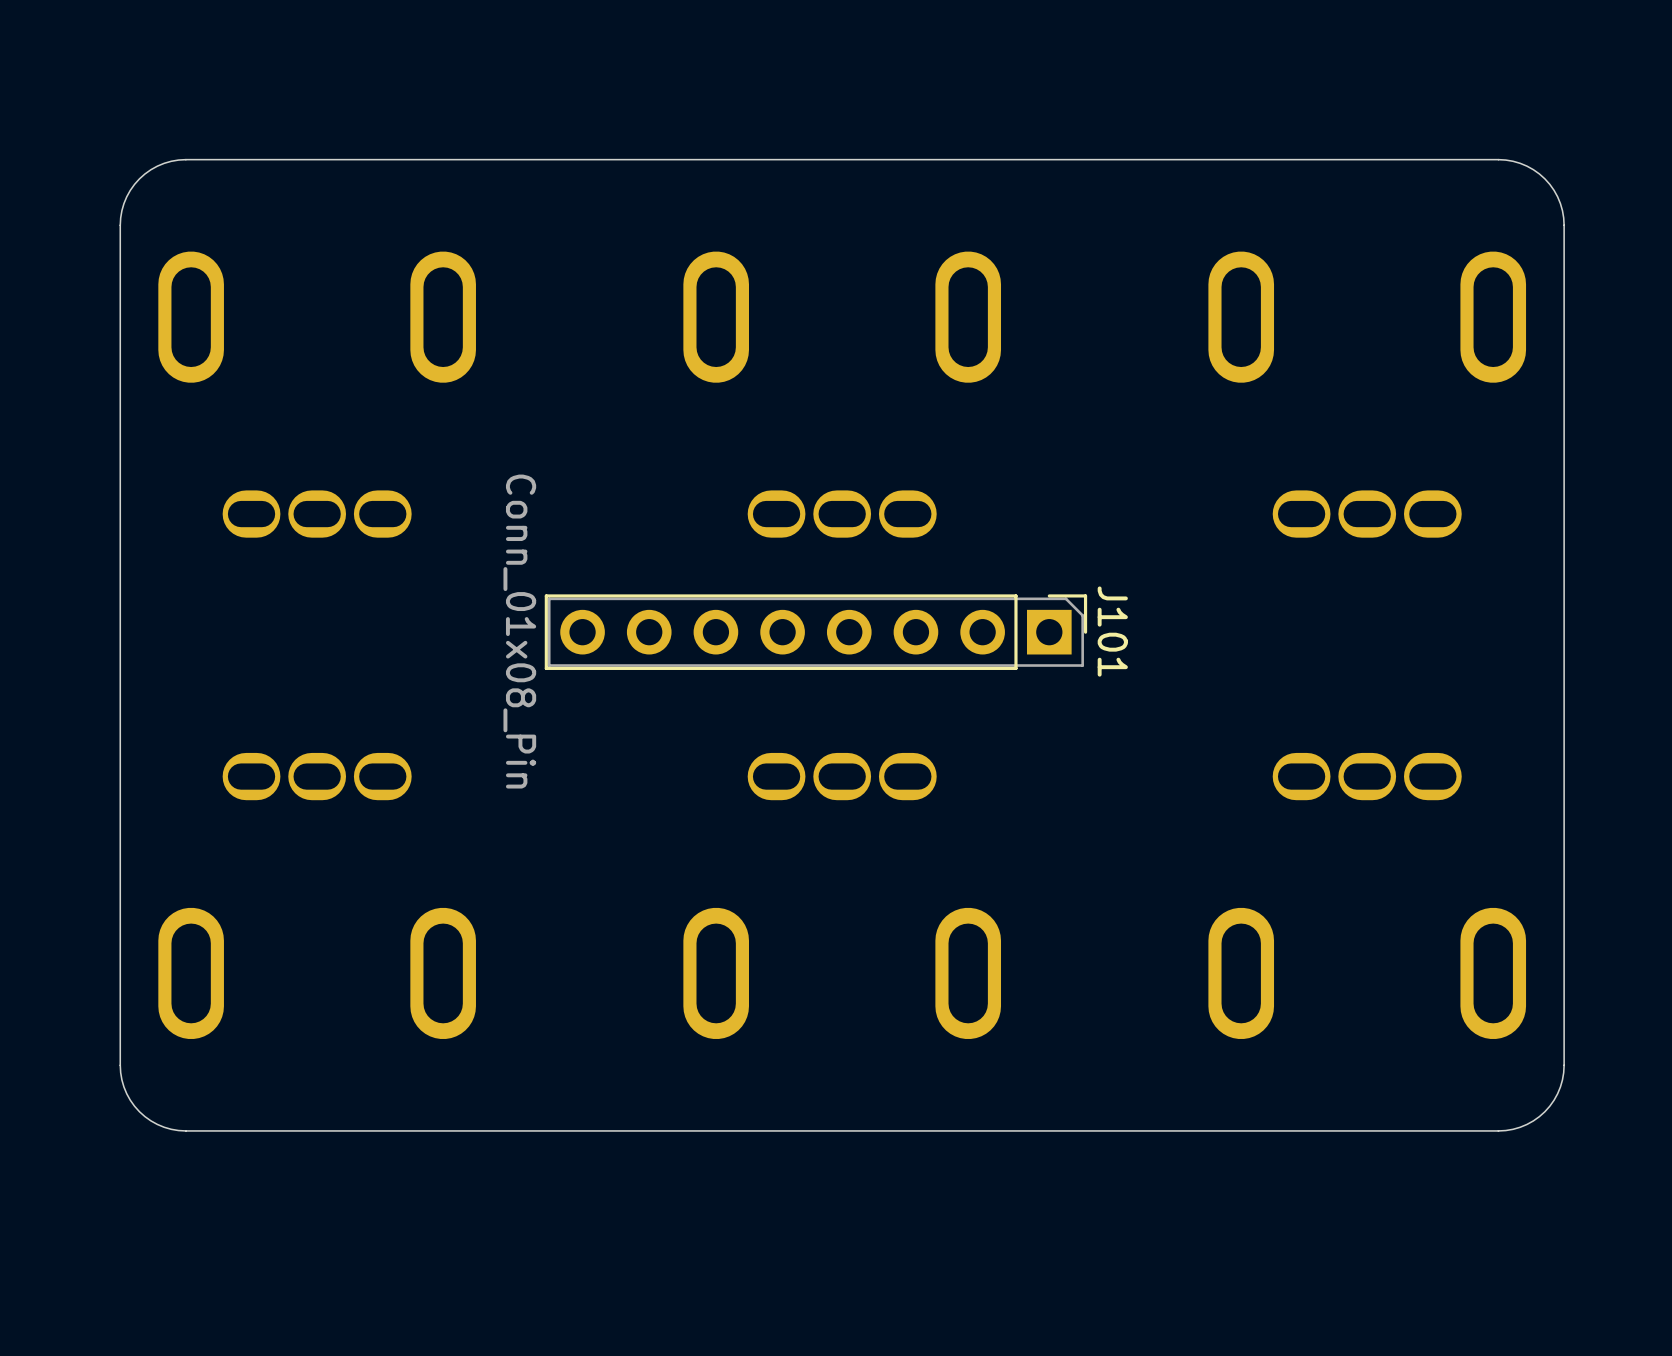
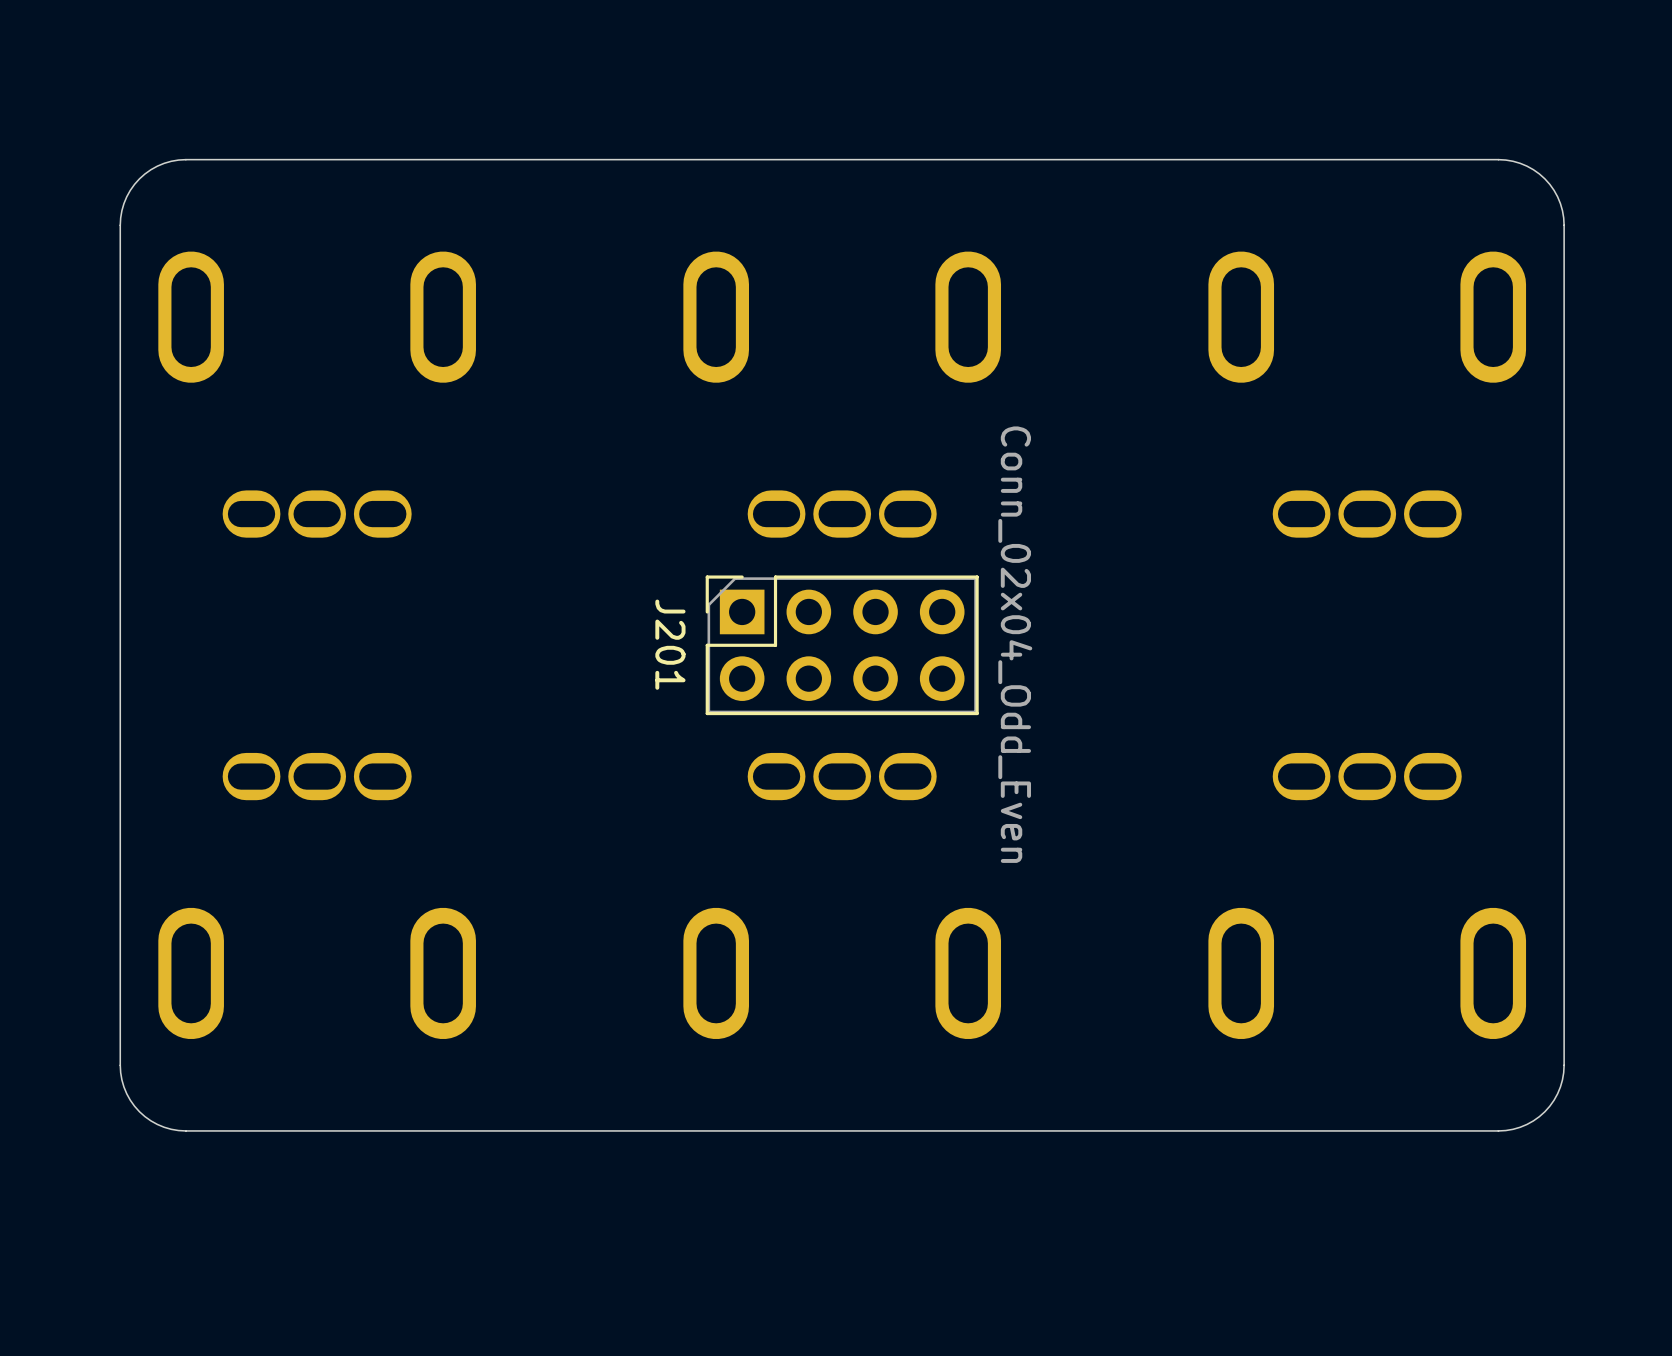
J101: Conn_01x08_Pin (815, 632) -> none
J201: none -> Conn_02x04_Odd_Even (842, 645)

